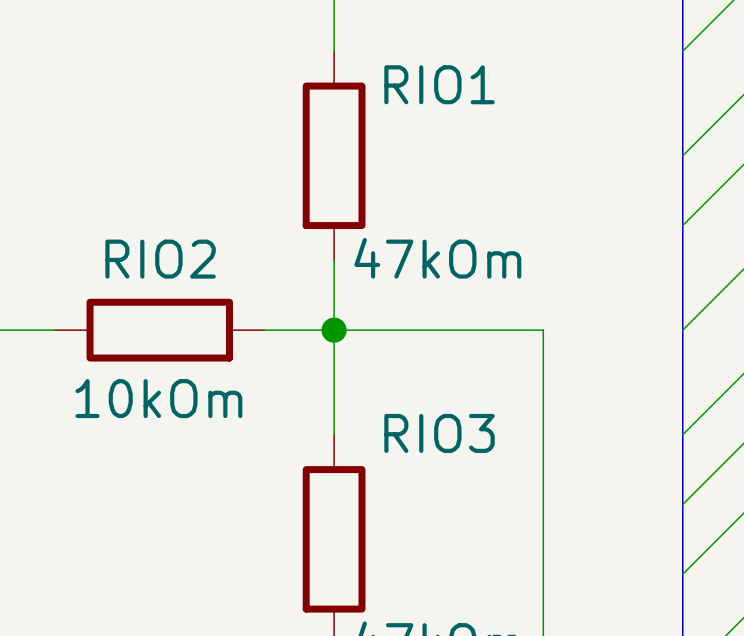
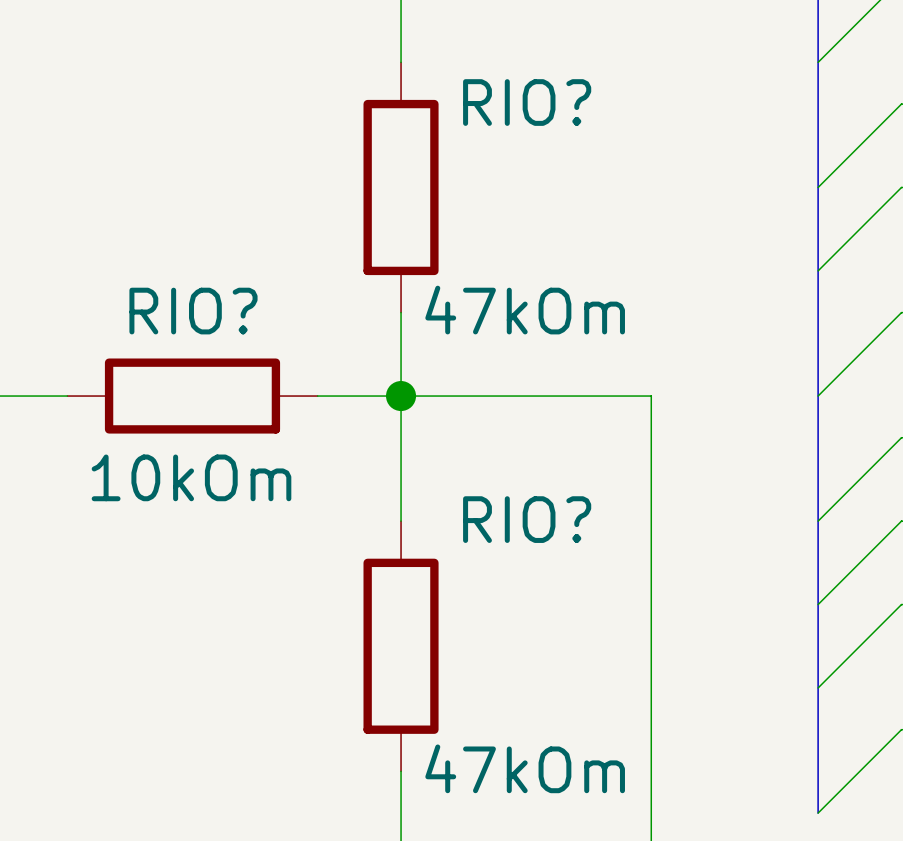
RIO1 name: RIO1 (439, 84) -> RIO? (527, 102)
RIO2 name: RIO2 (160, 259) -> RIO? (193, 311)
RIO3 name: RIO3 (439, 433) -> RIO? (527, 519)

